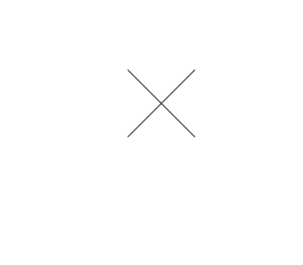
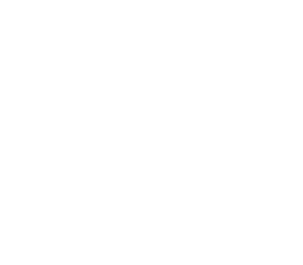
no-connect mark: (161, 103) -> none

